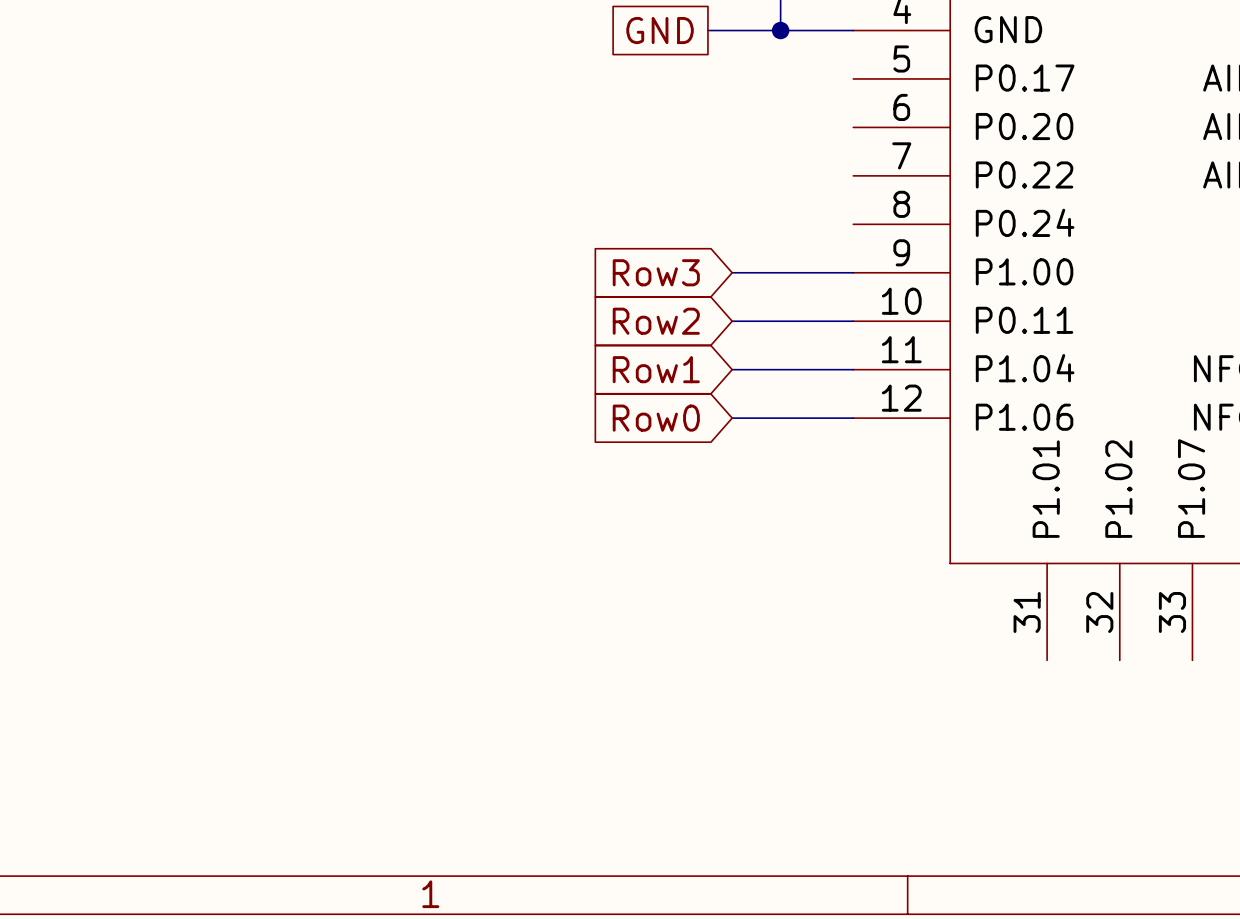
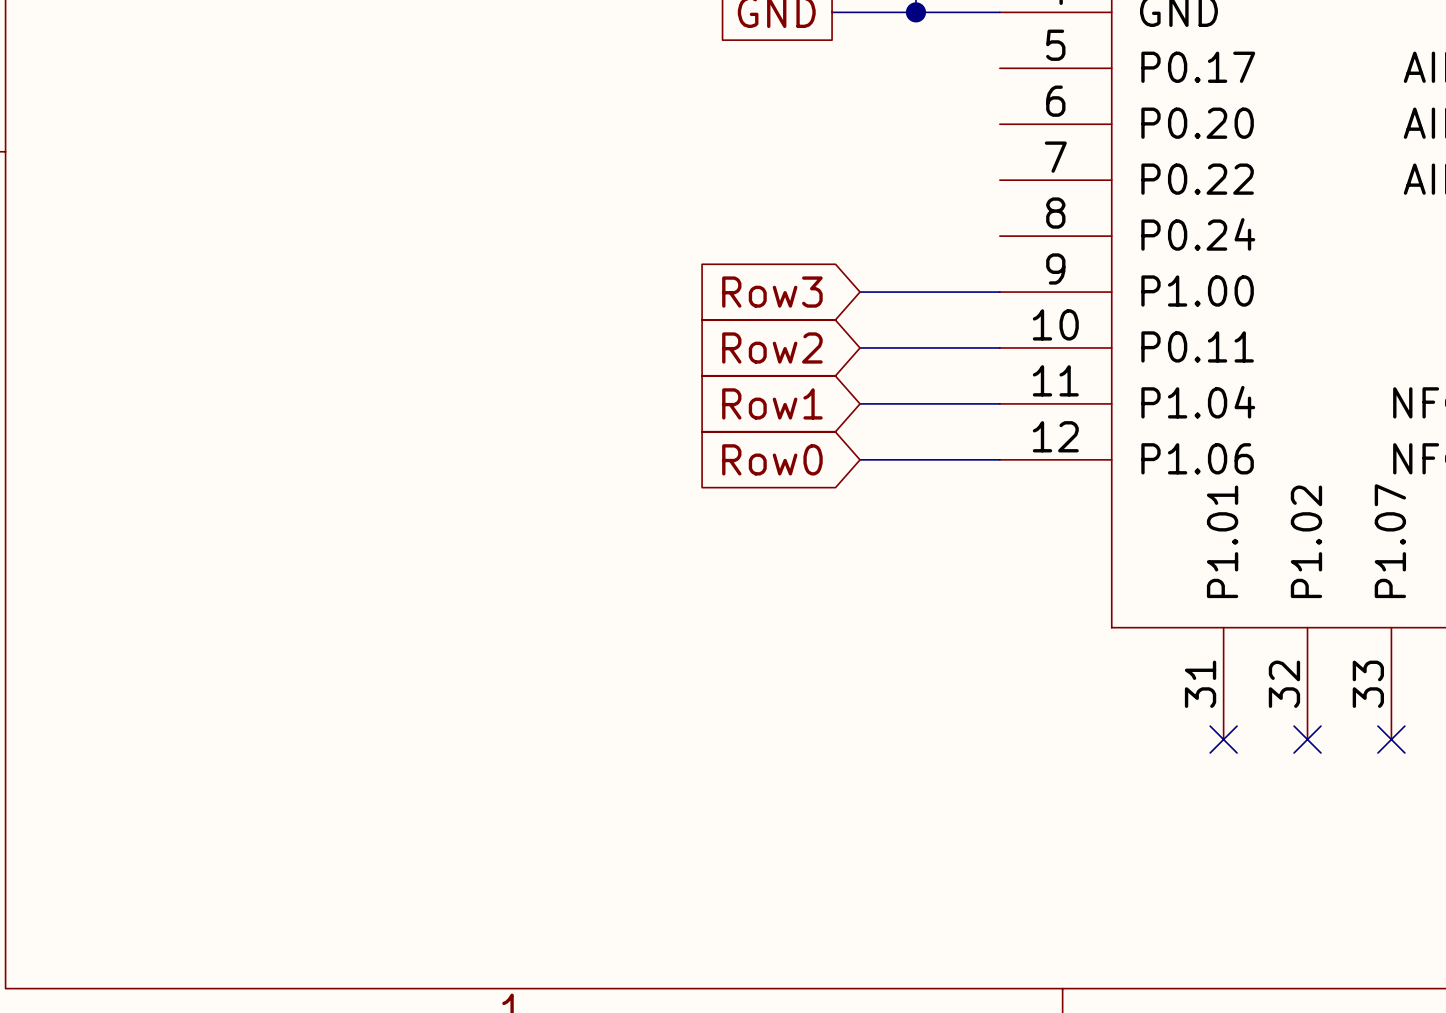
no-connect mark: none -> (1223, 739)
no-connect mark: none -> (1307, 739)
no-connect mark: none -> (1391, 739)

